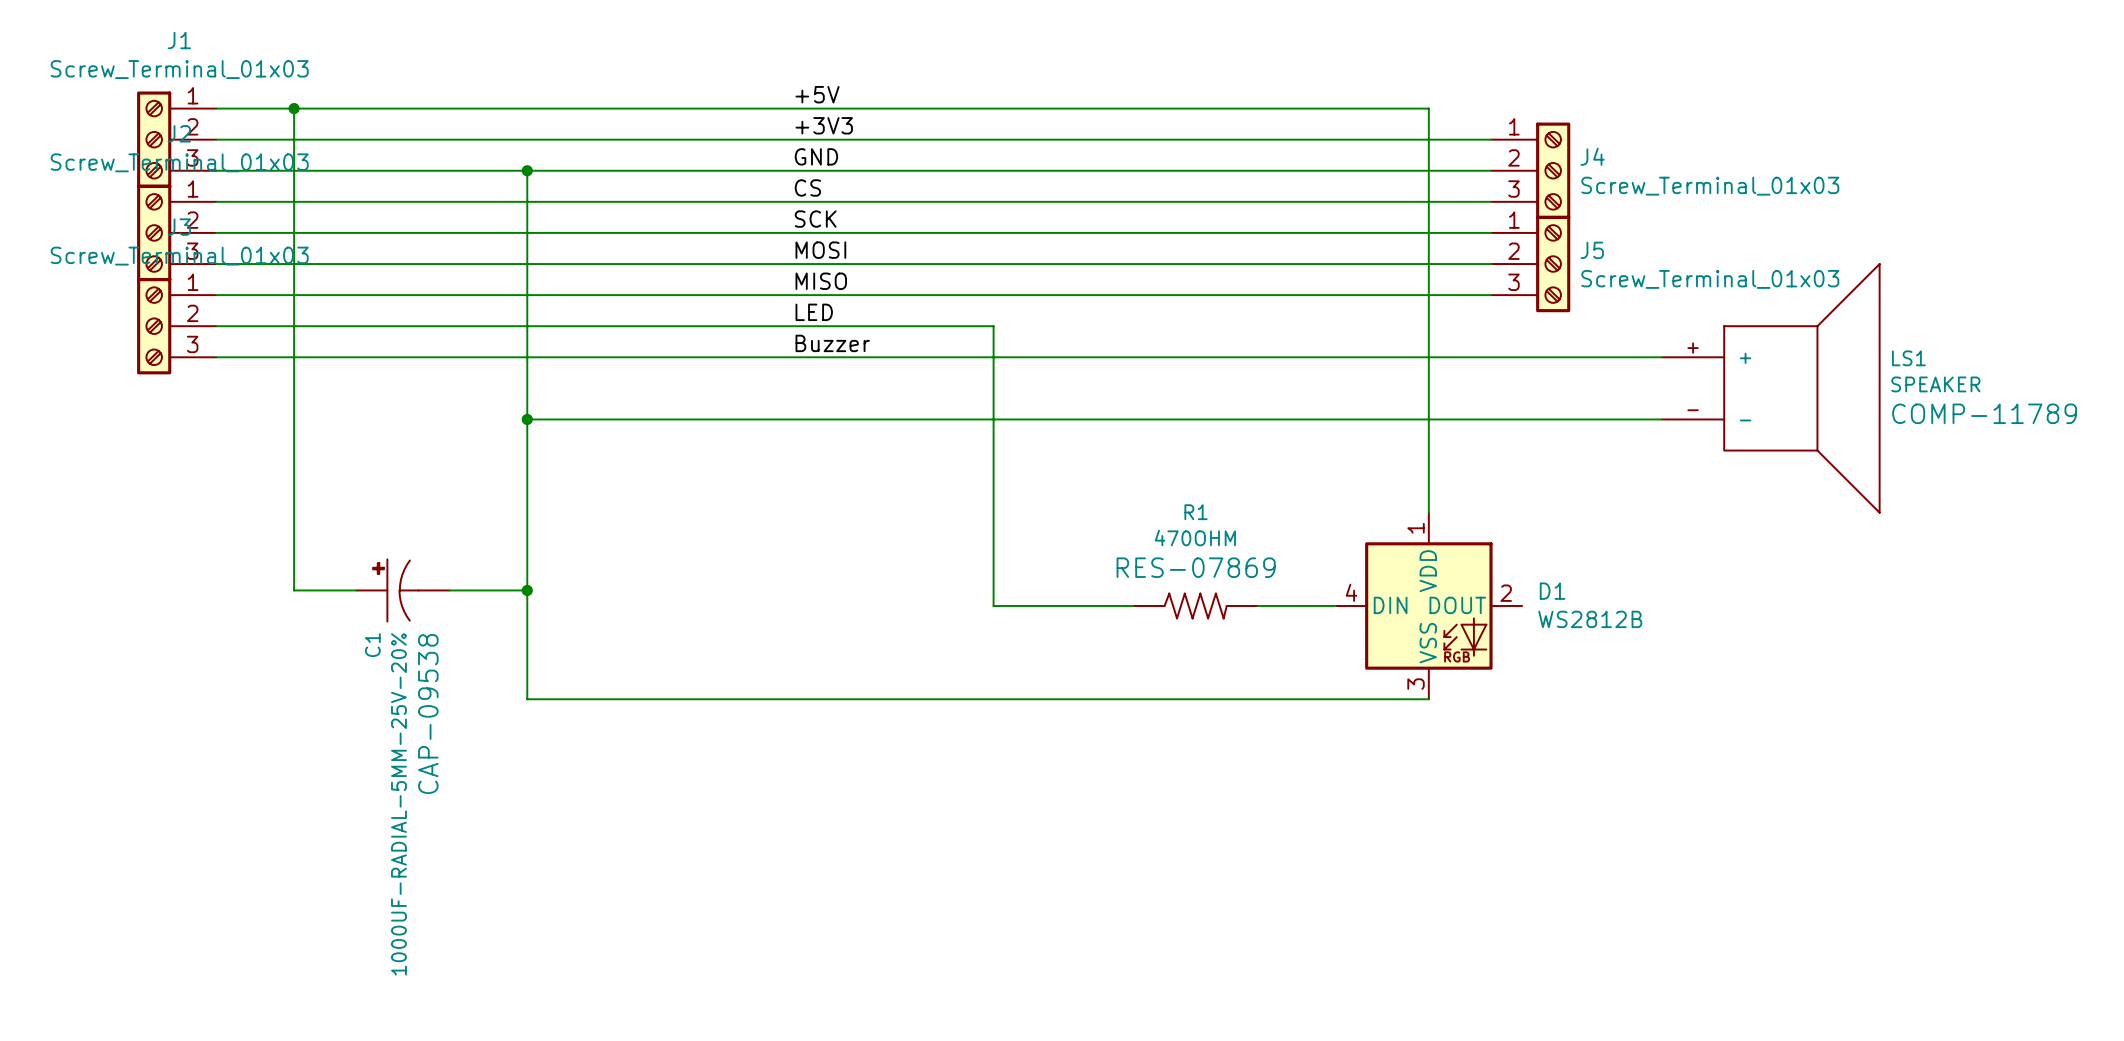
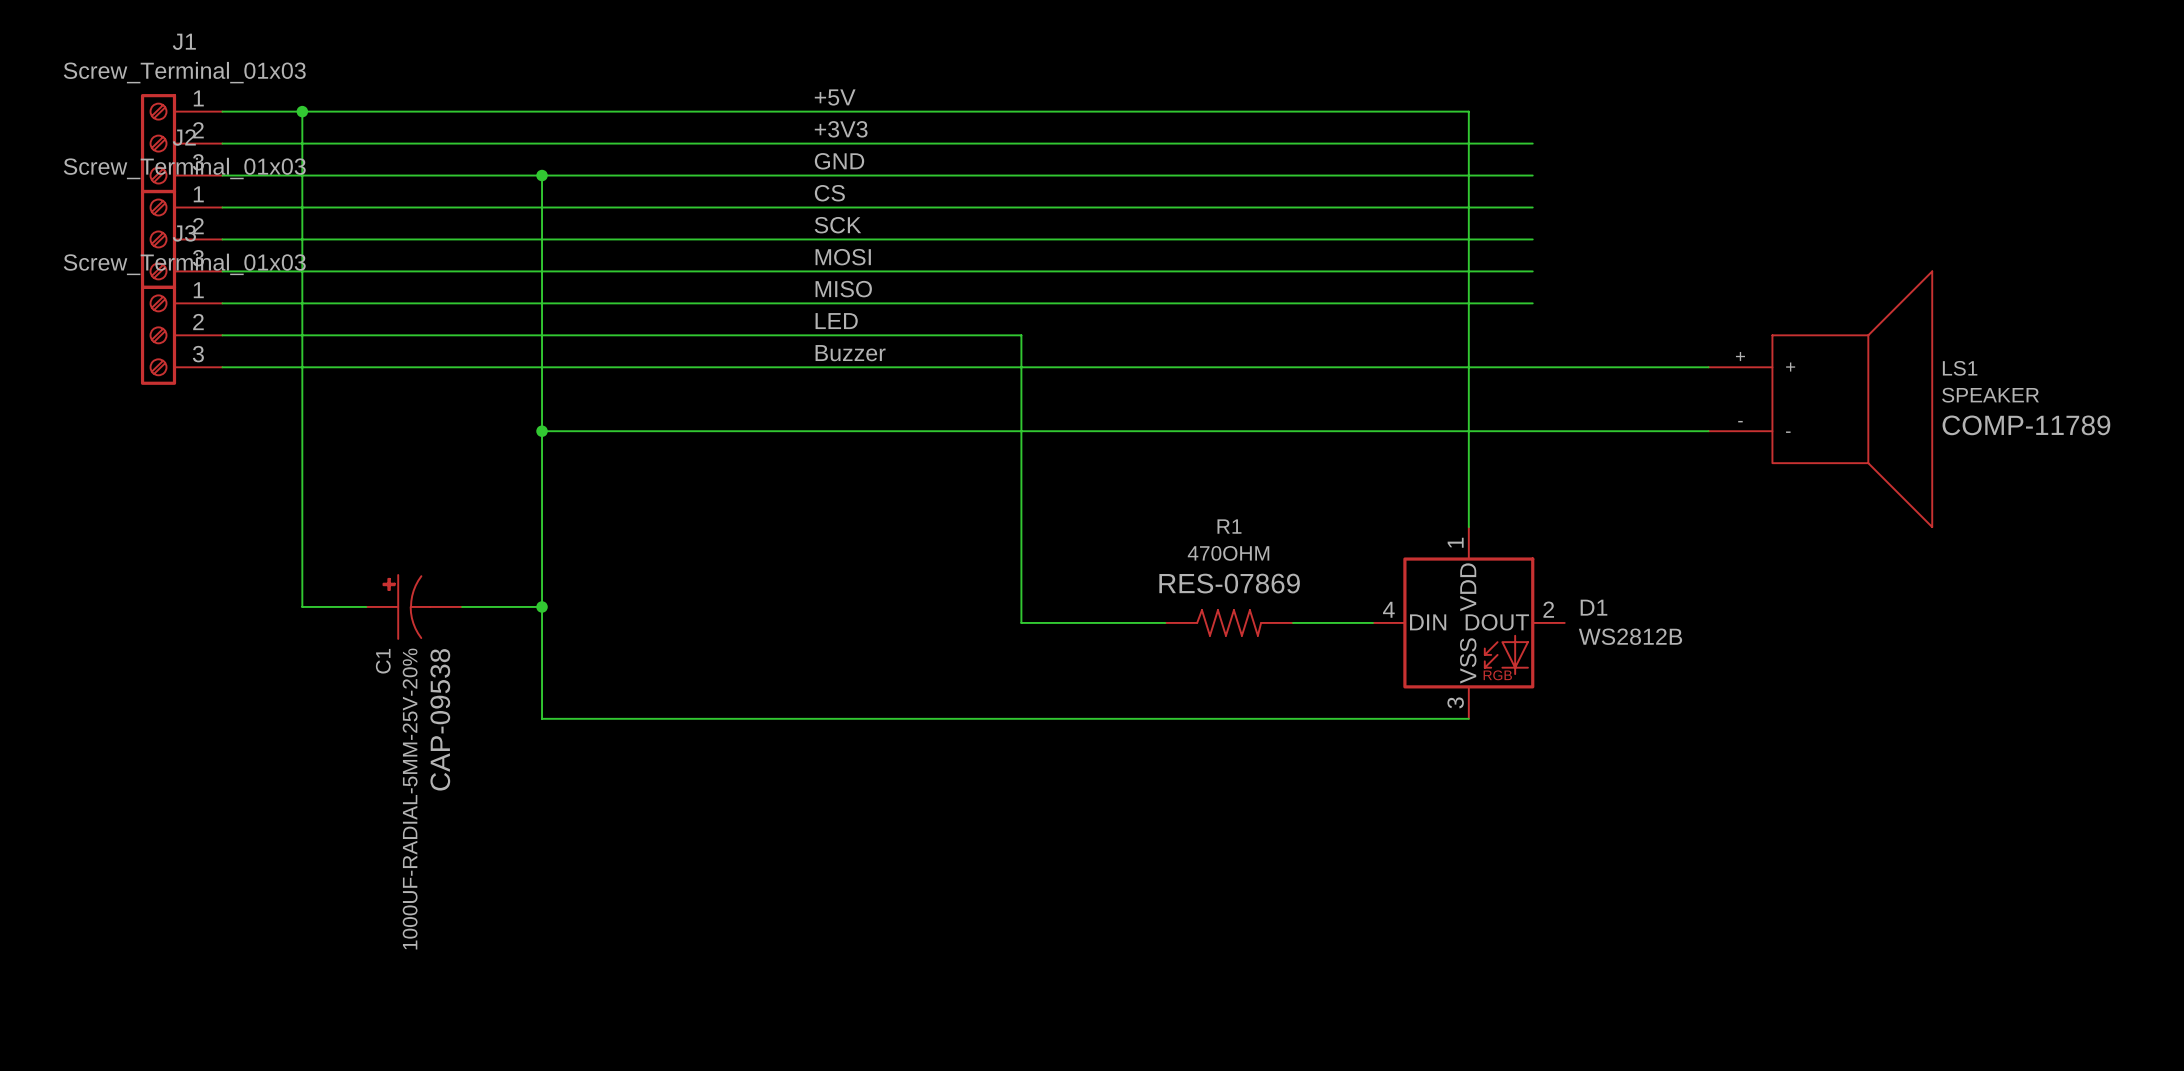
J4: Screw_Terminal_01x03 (1530, 170) -> none
J5: Screw_Terminal_01x03 (1530, 264) -> none

